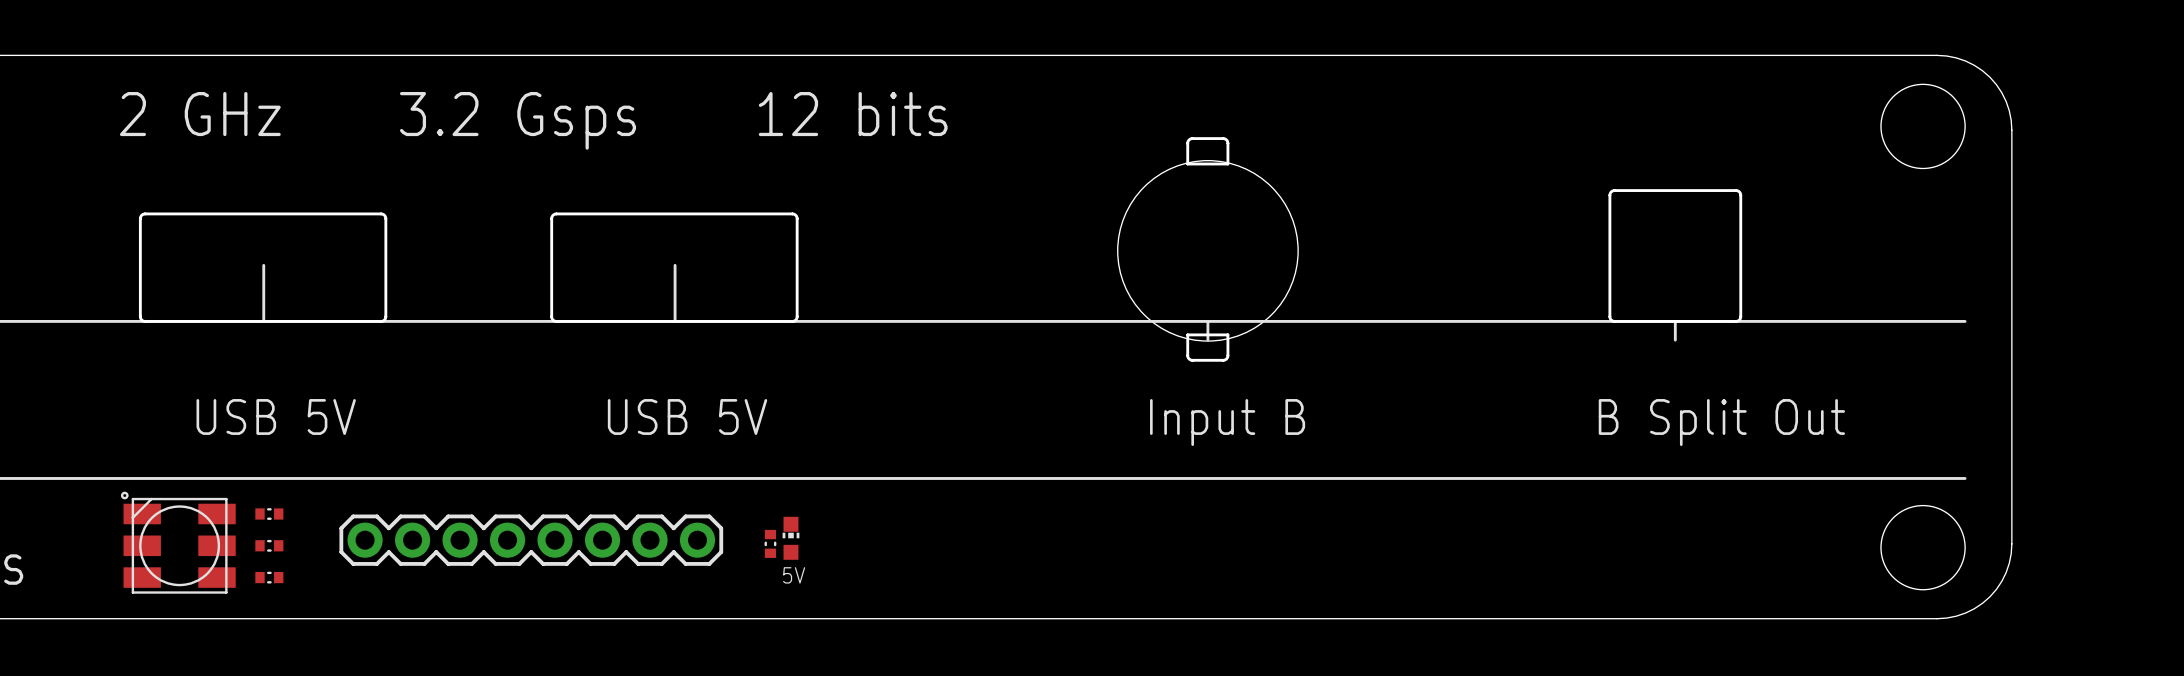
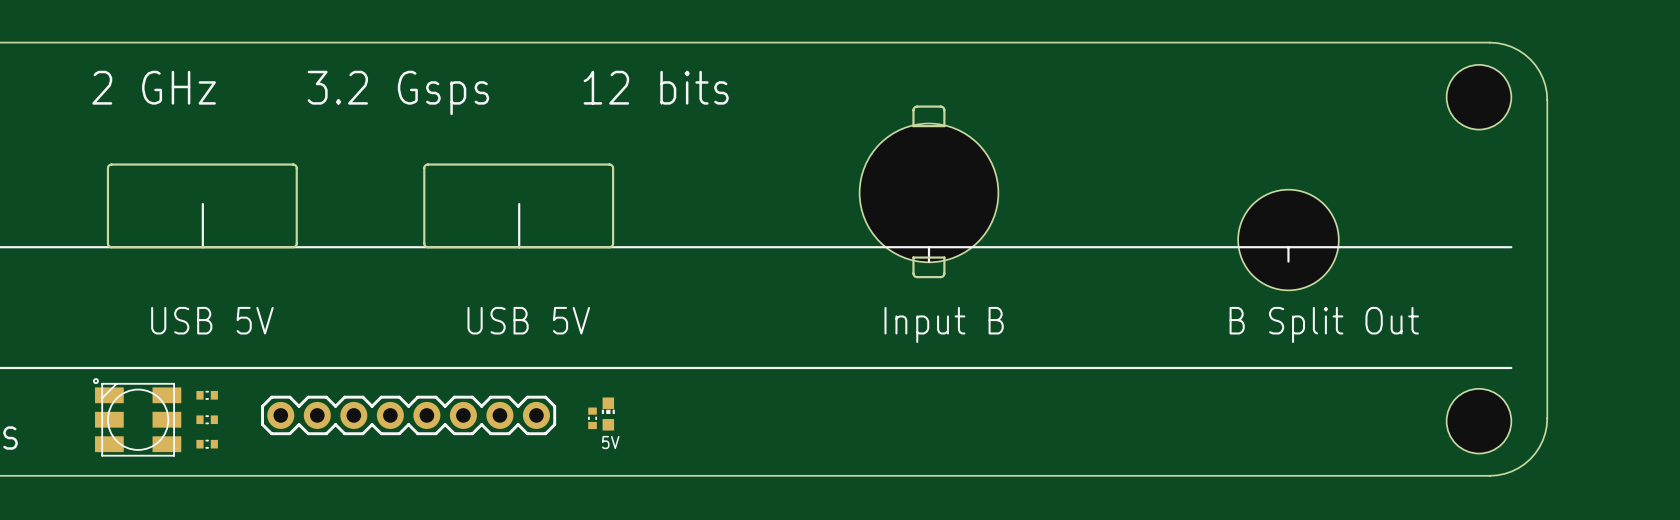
board edge: (1614, 190) (1739, 191) (1739, 320) (1611, 320) (1609, 195) (1614, 190) -> none
hole: none -> (1288, 240)

